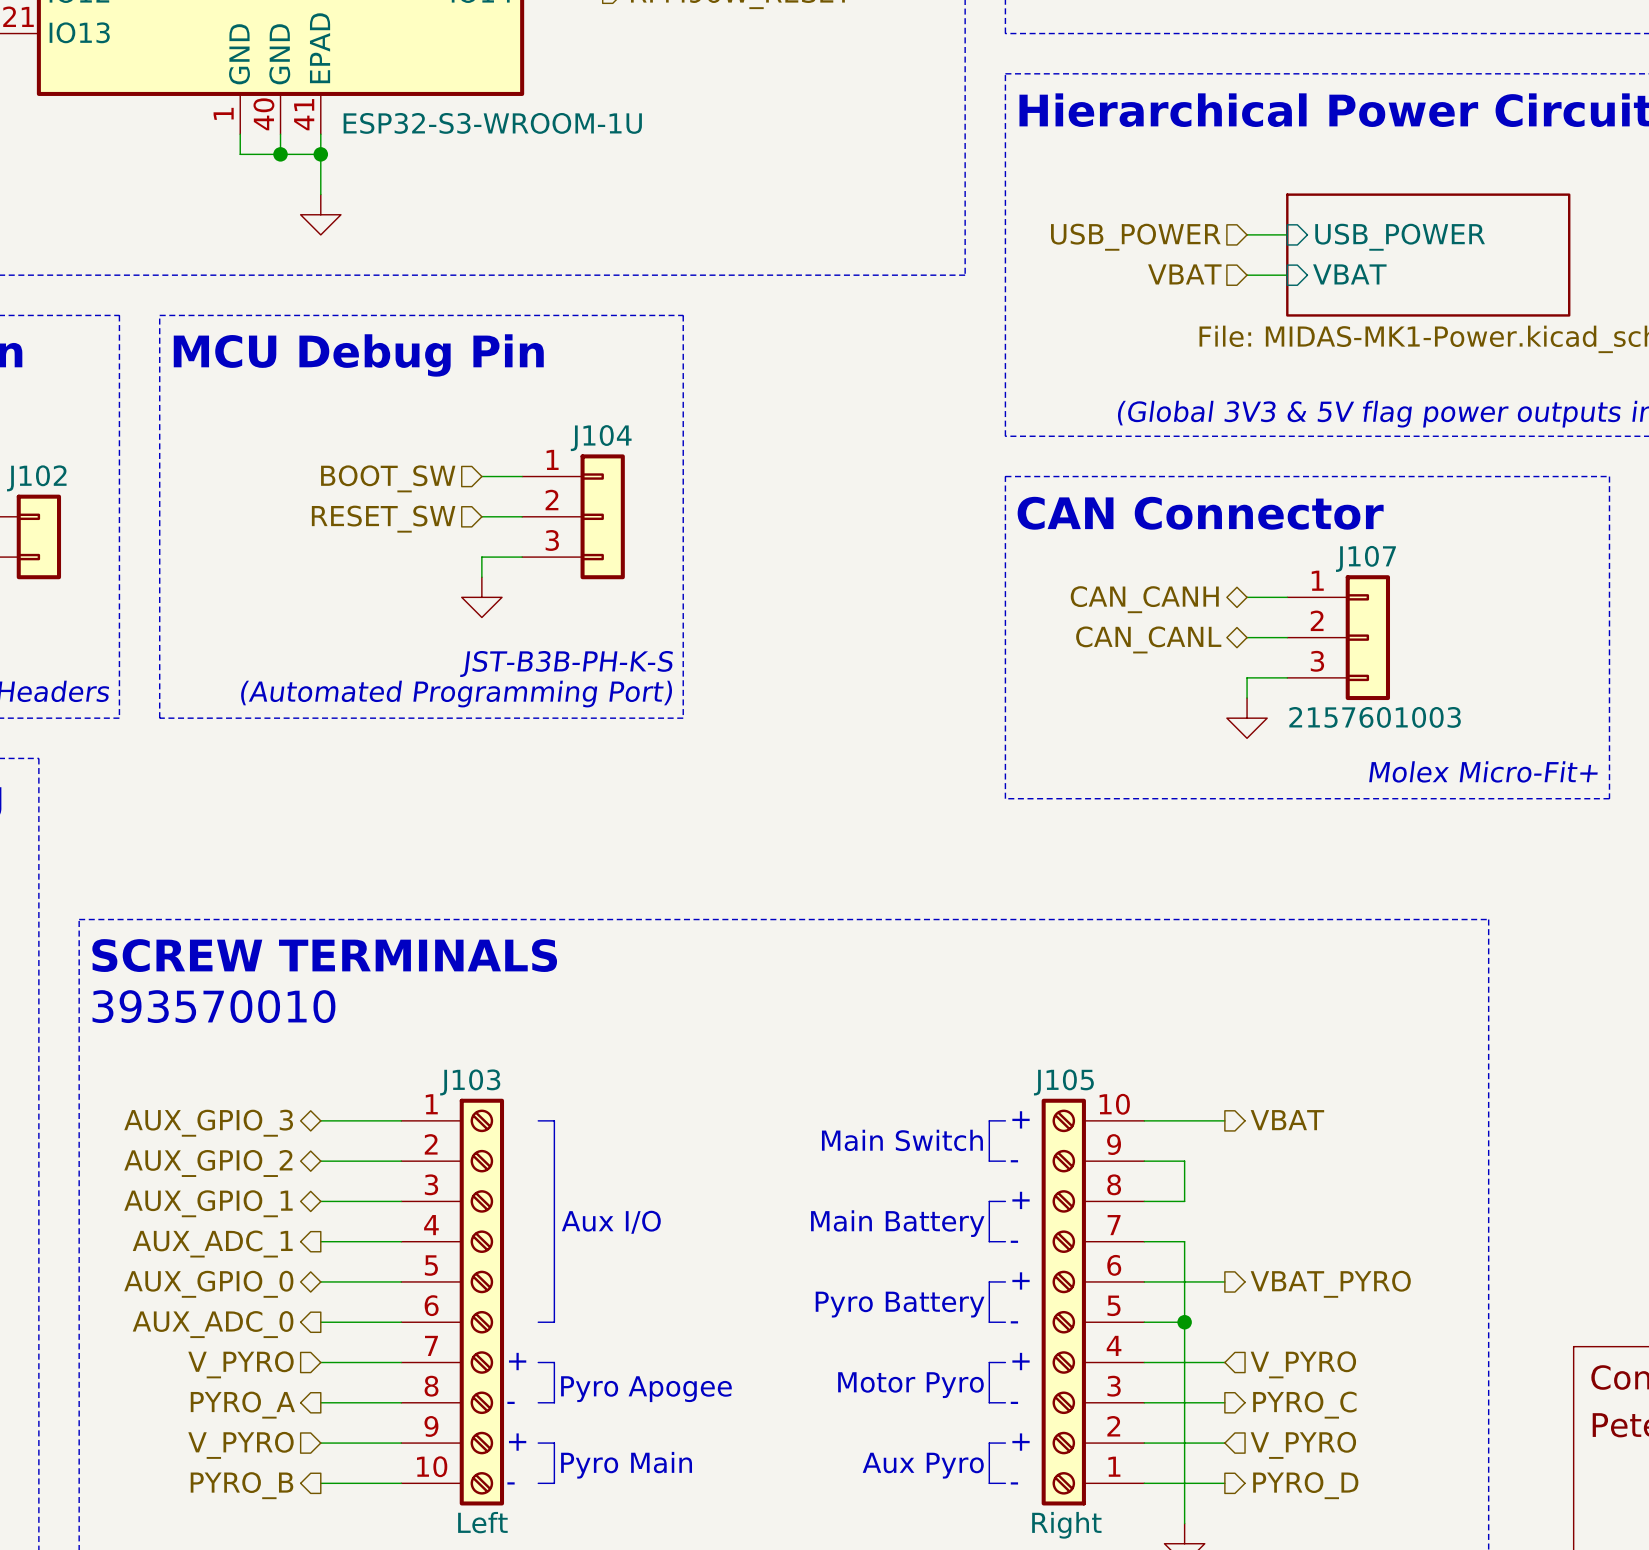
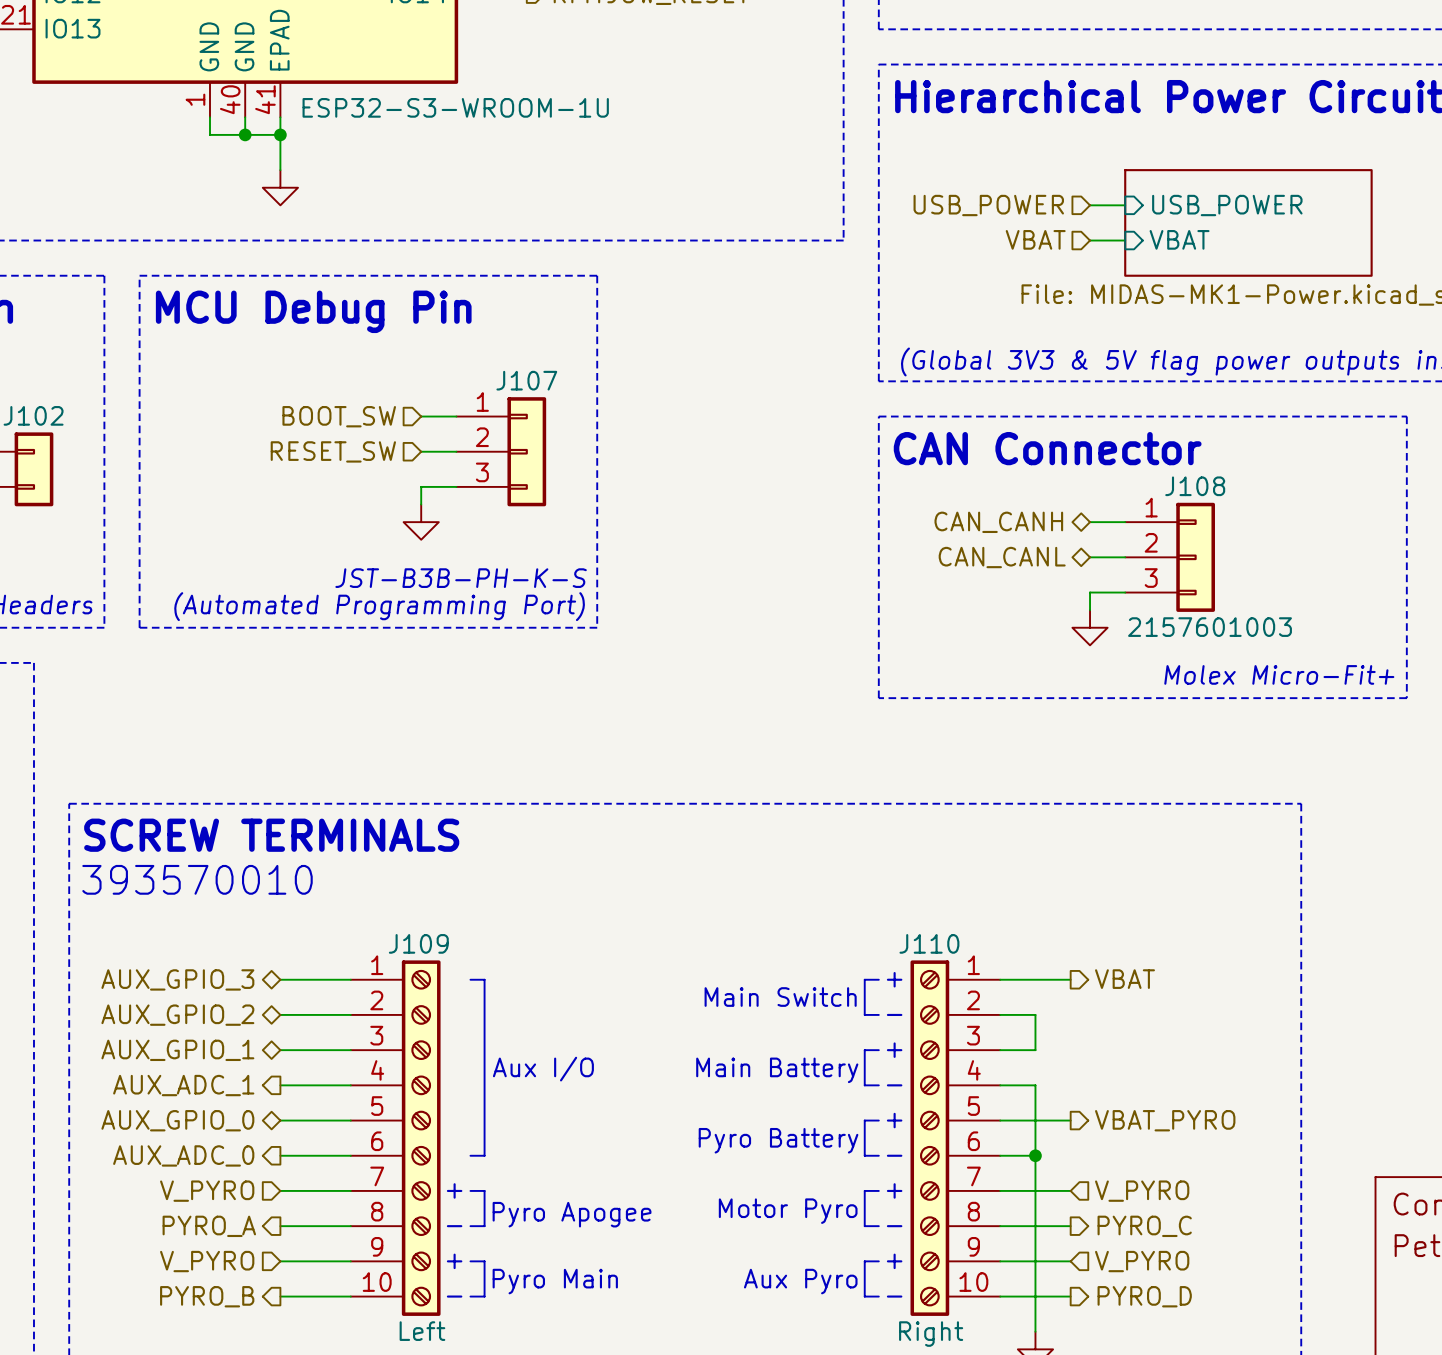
J104 name: J104 (601, 438) -> J107 (526, 380)
J107 name: J107 (1365, 558) -> J108 (1195, 486)
J103 name: J103 (470, 1082) -> J109 (418, 943)
J105: Right (1093, 1302) -> none
J110: none -> Right (955, 1138)

